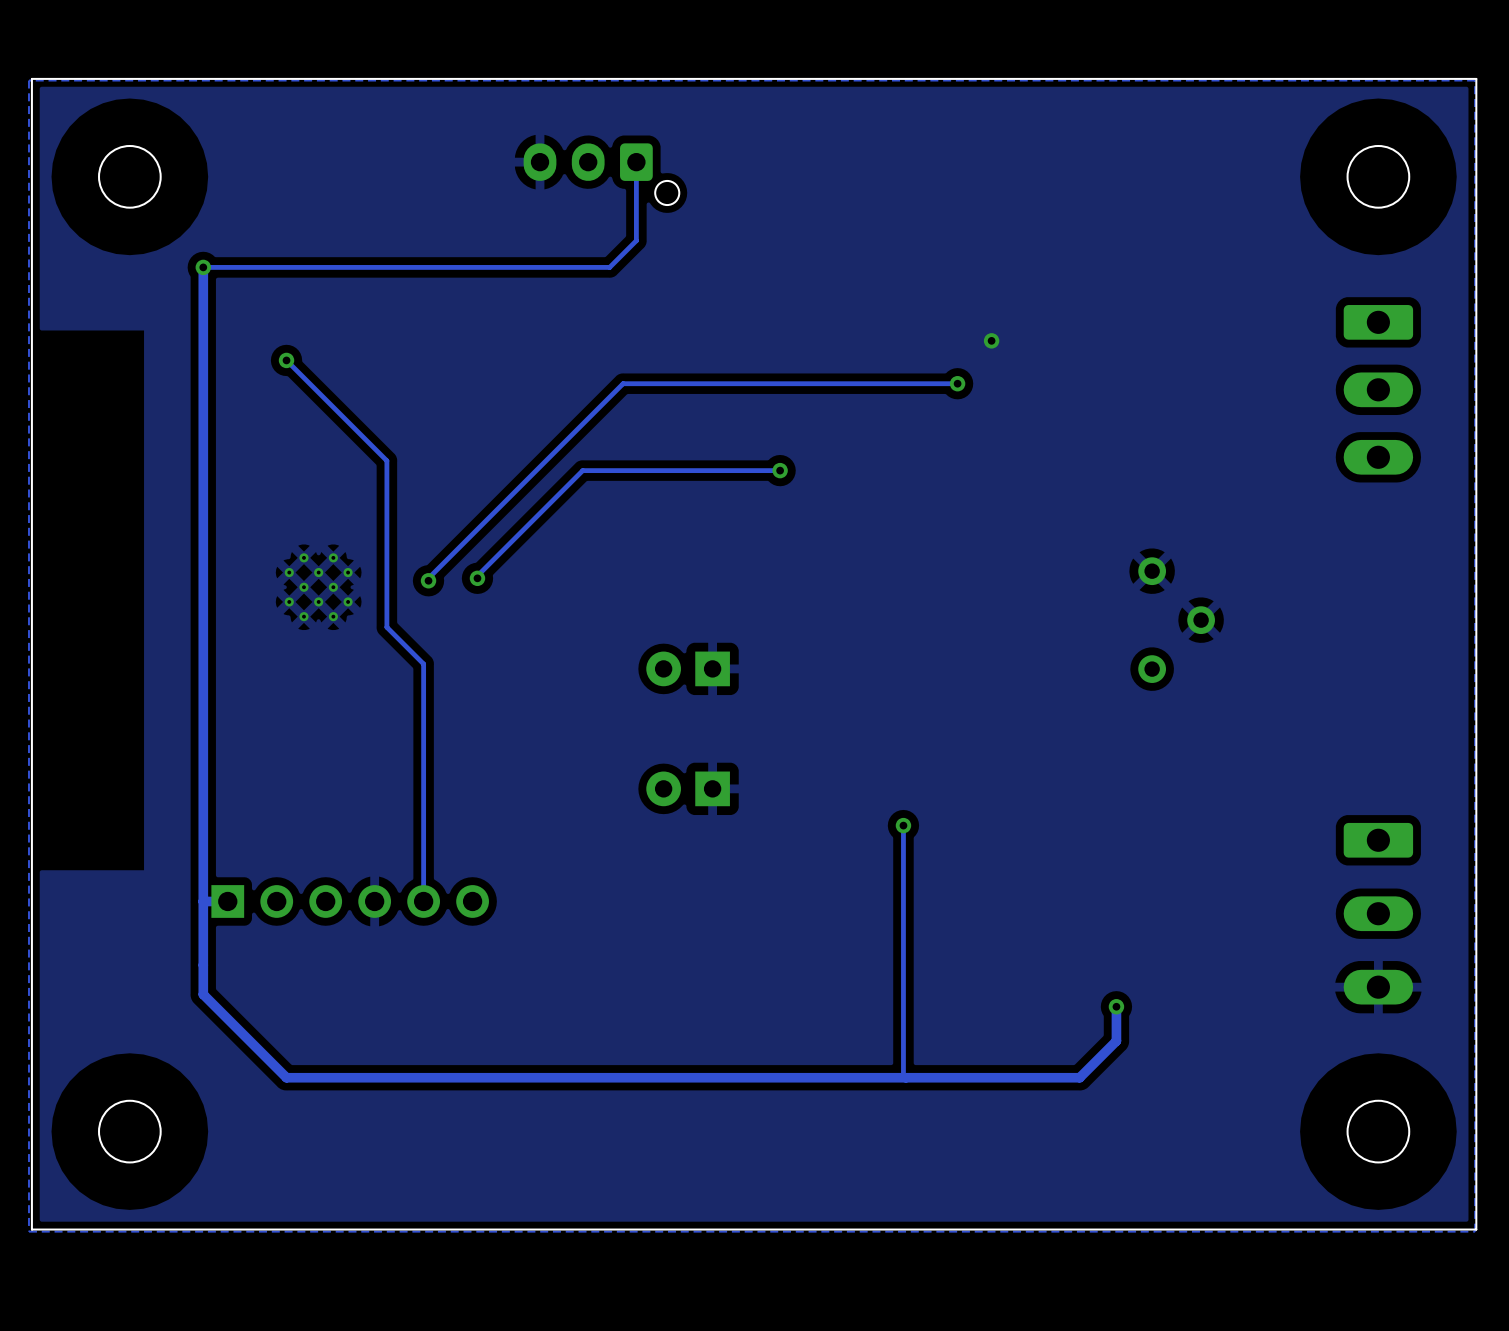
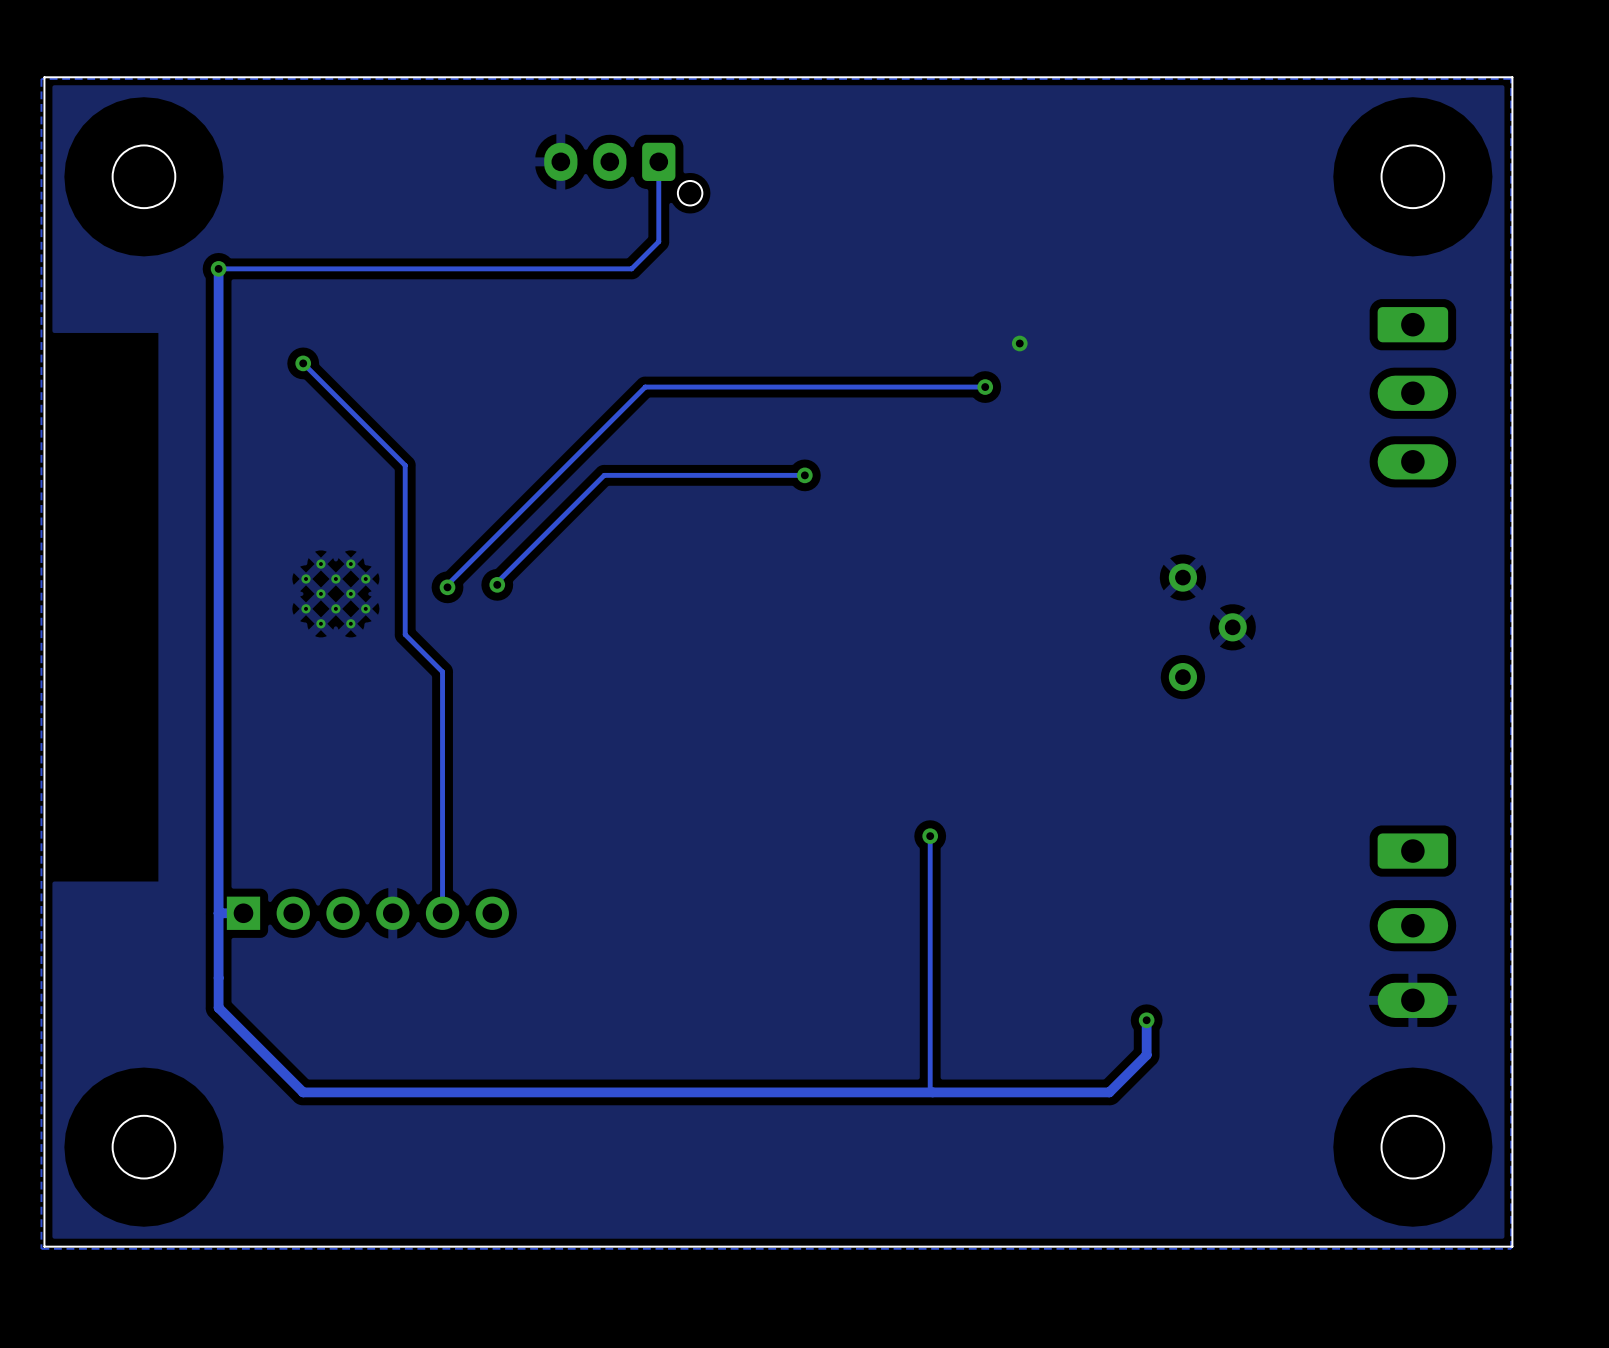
part: (688, 668) -> none
part: (688, 788) -> none

